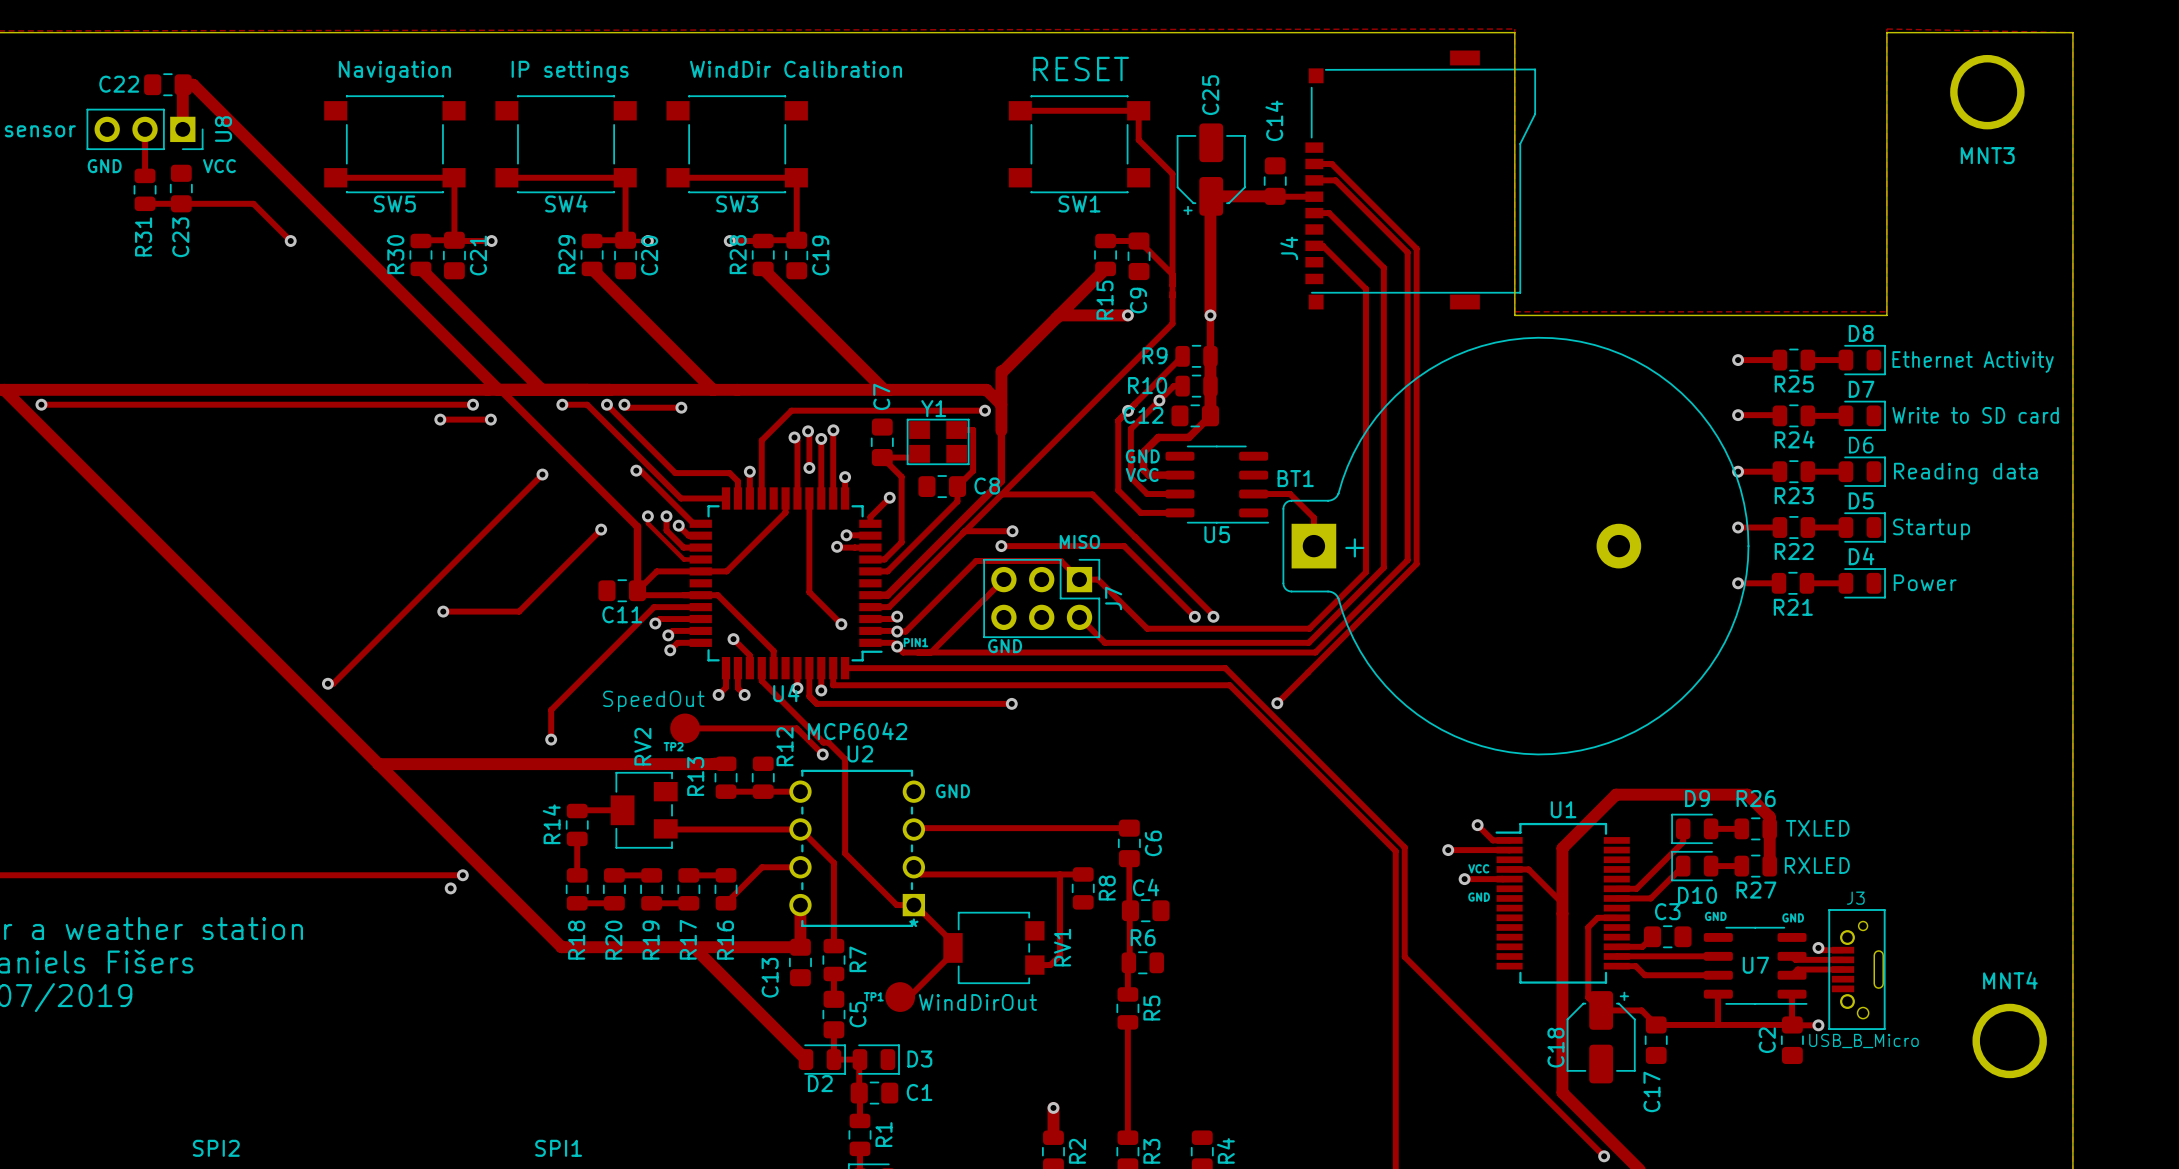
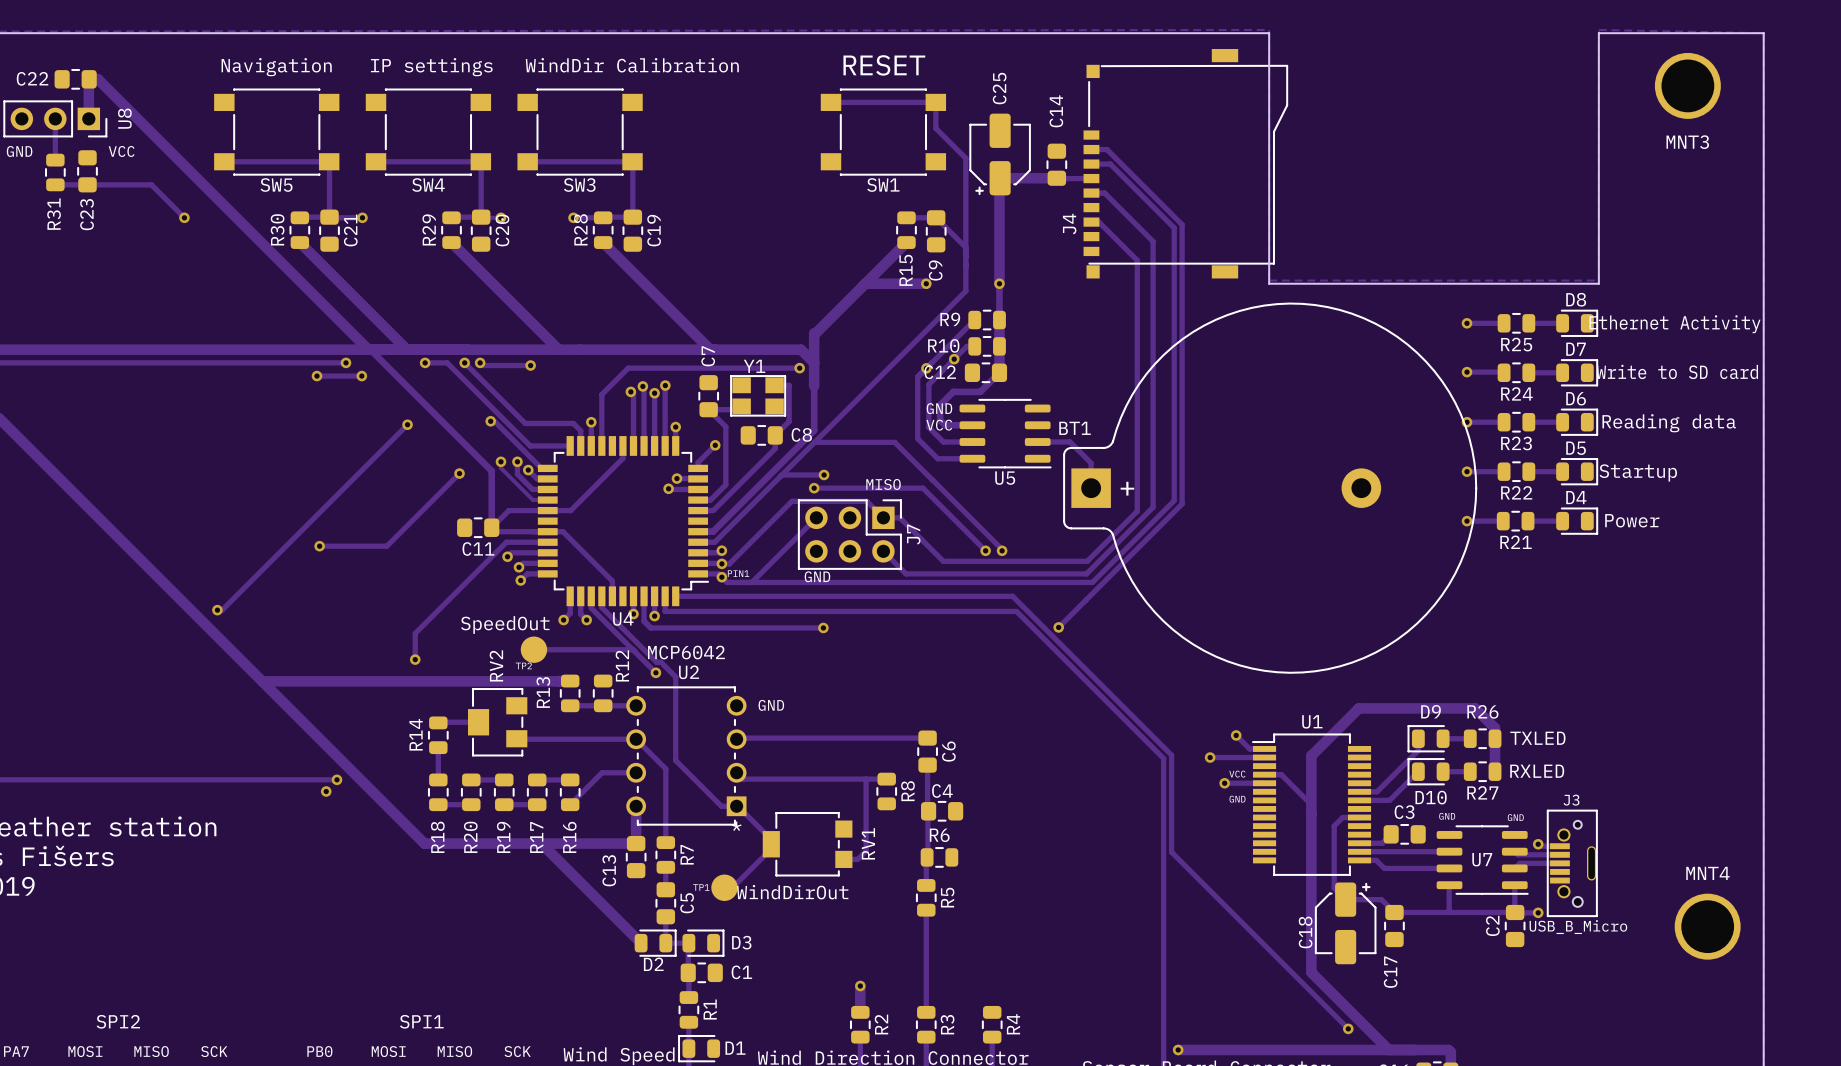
via: (809, 467) -> none
track: (809, 498) (809, 592) (841, 624) -> (644, 445) (644, 418)
via: (841, 624) -> none
track: (733, 639) (749, 655) (749, 668) -> (632, 649) (591, 608) (591, 596)
via: (733, 639) -> none

